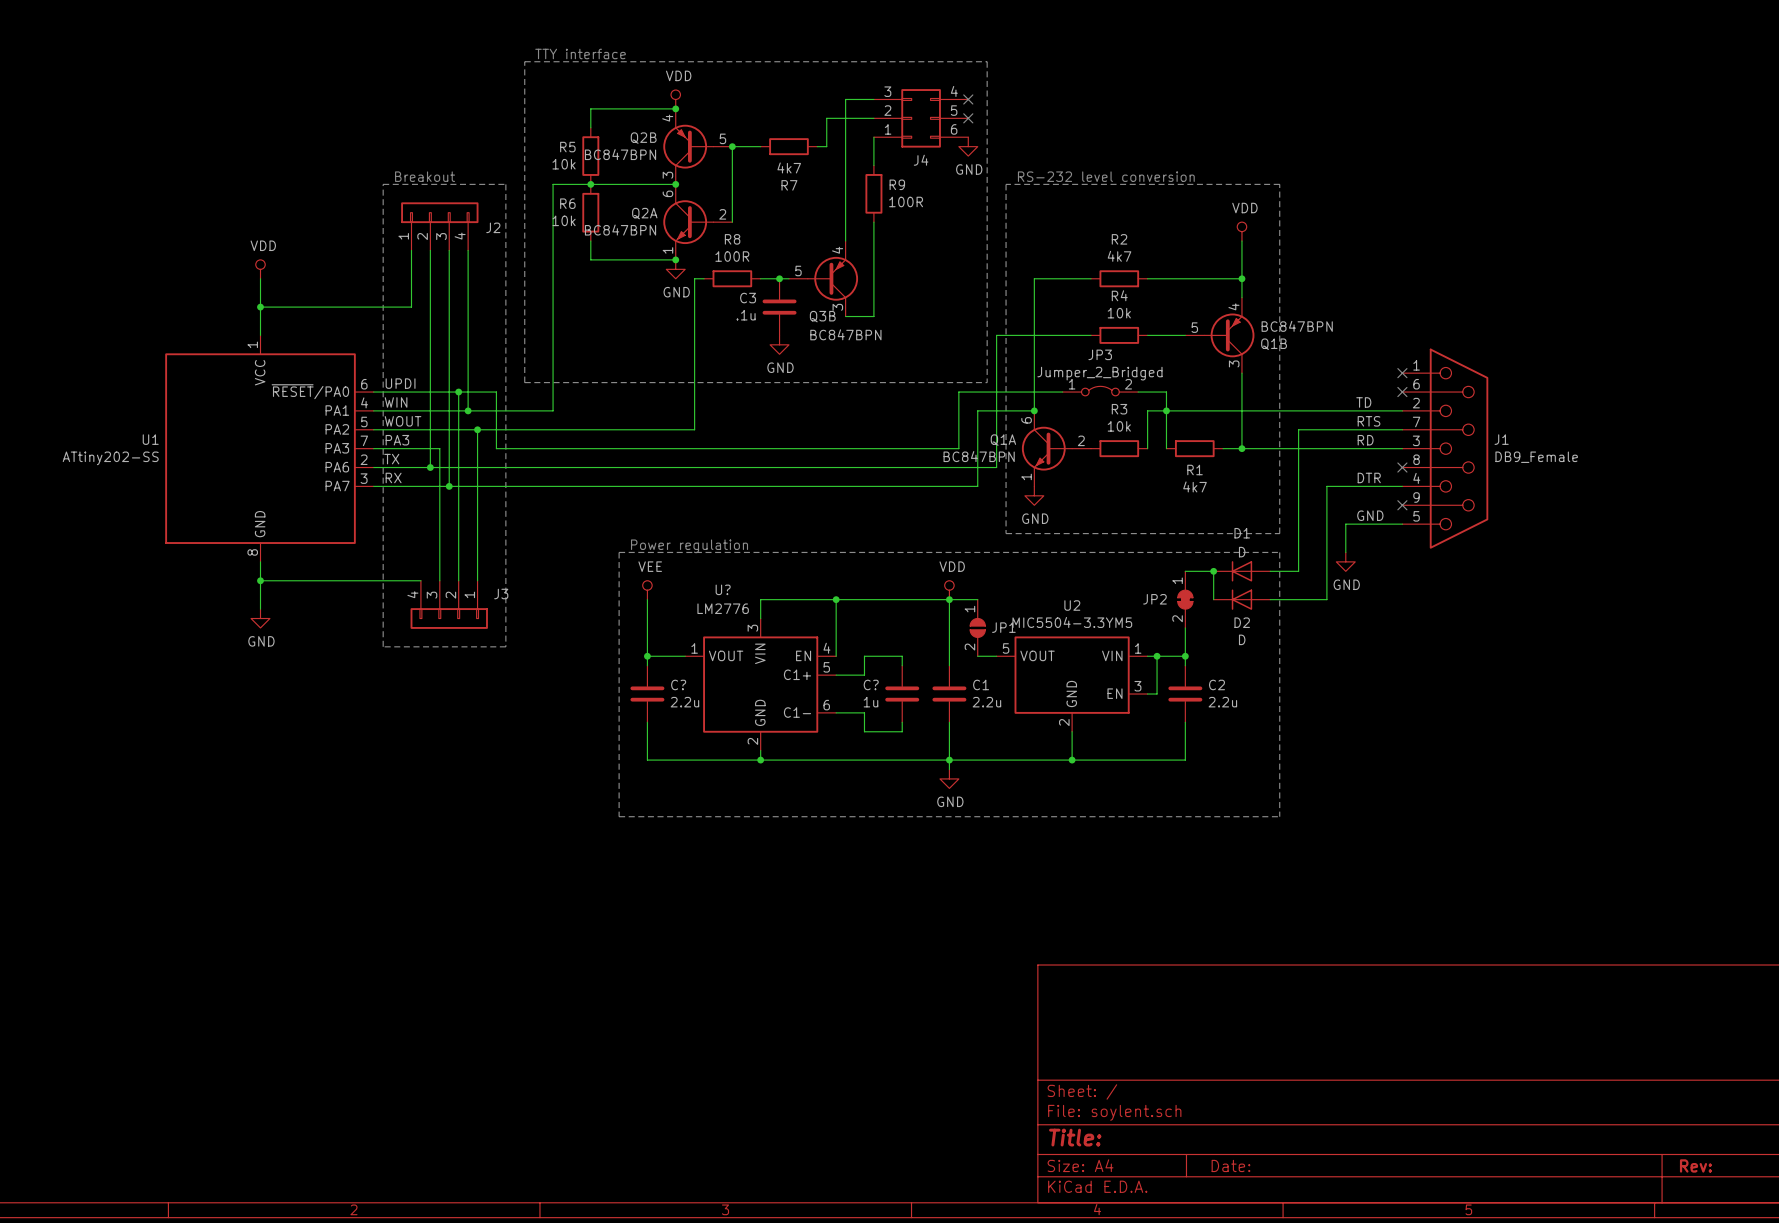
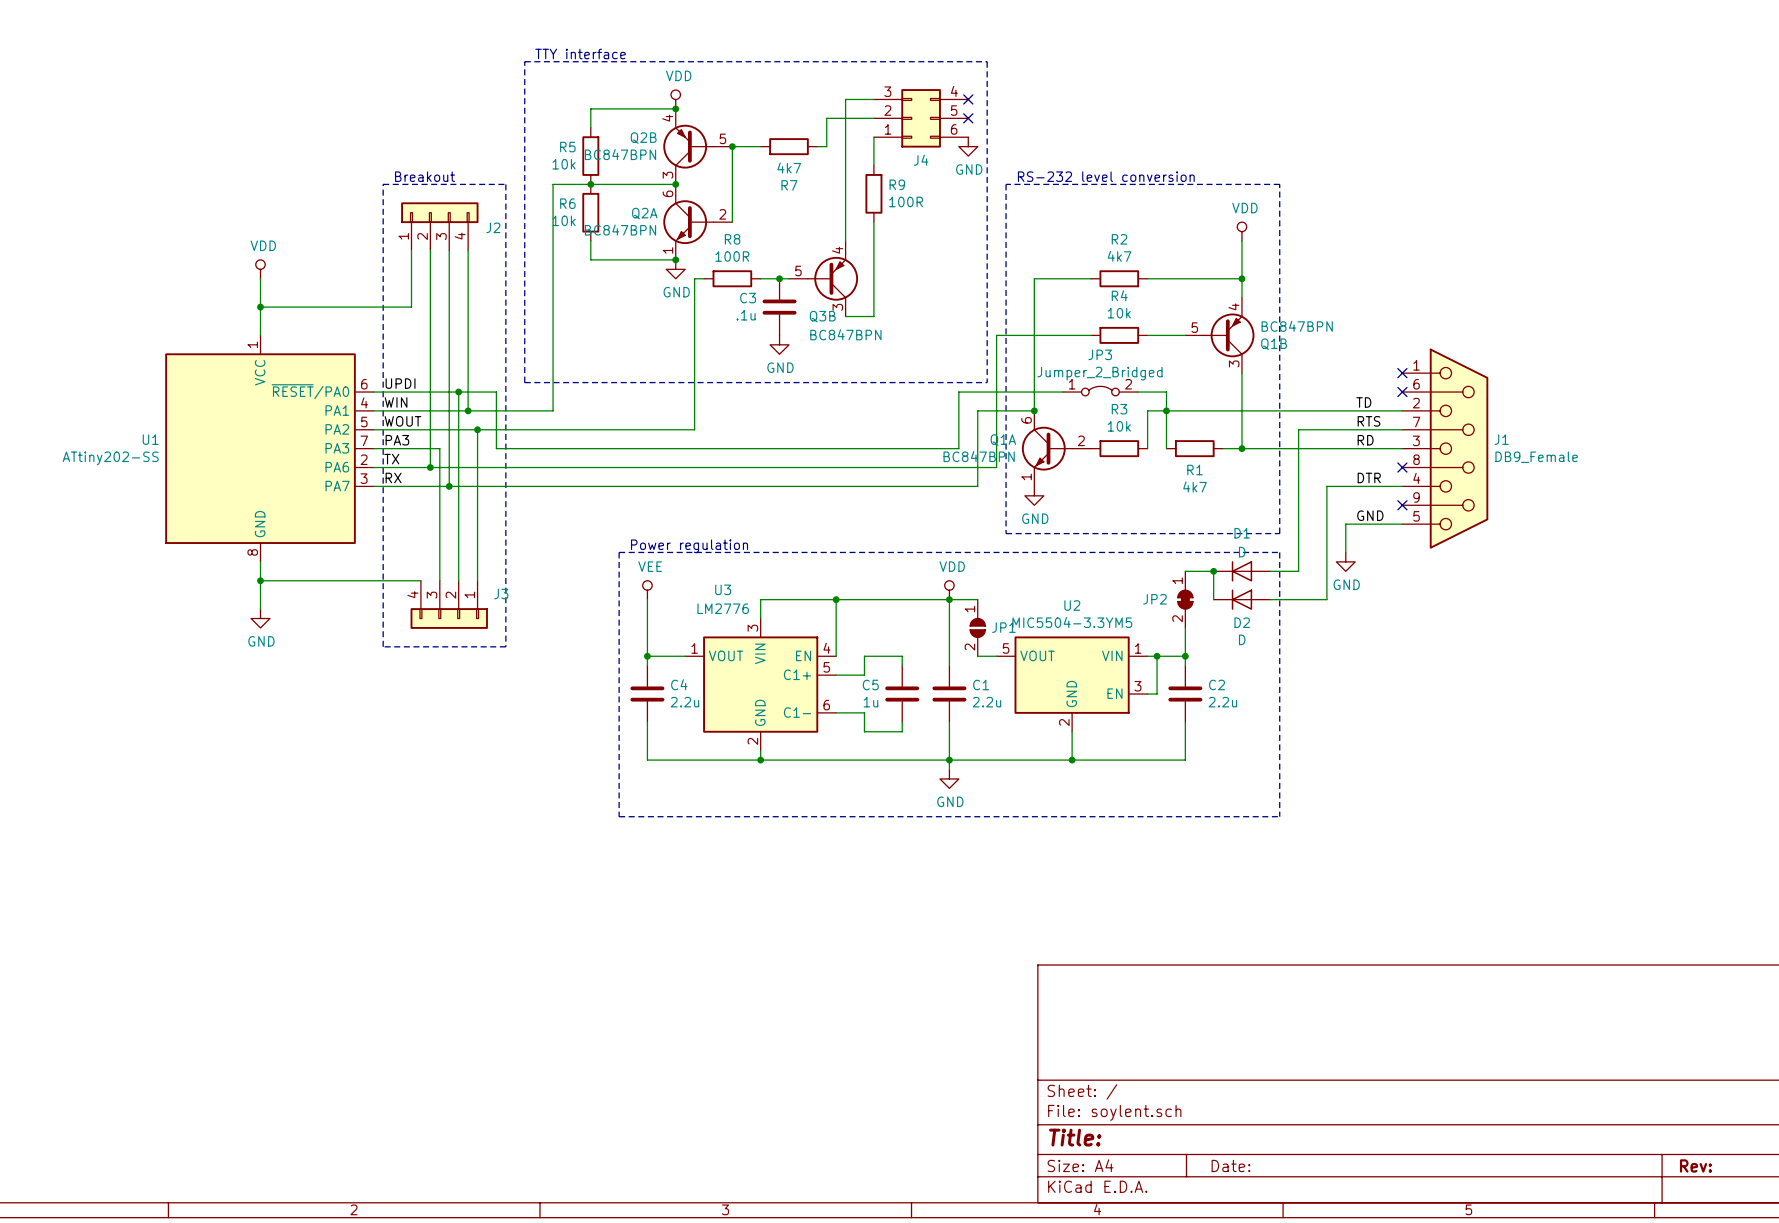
U? name: U? (723, 589) -> U3 (723, 589)
C? name: C? (678, 684) -> C4 (679, 684)
C? name: C? (871, 684) -> C5 (870, 684)

